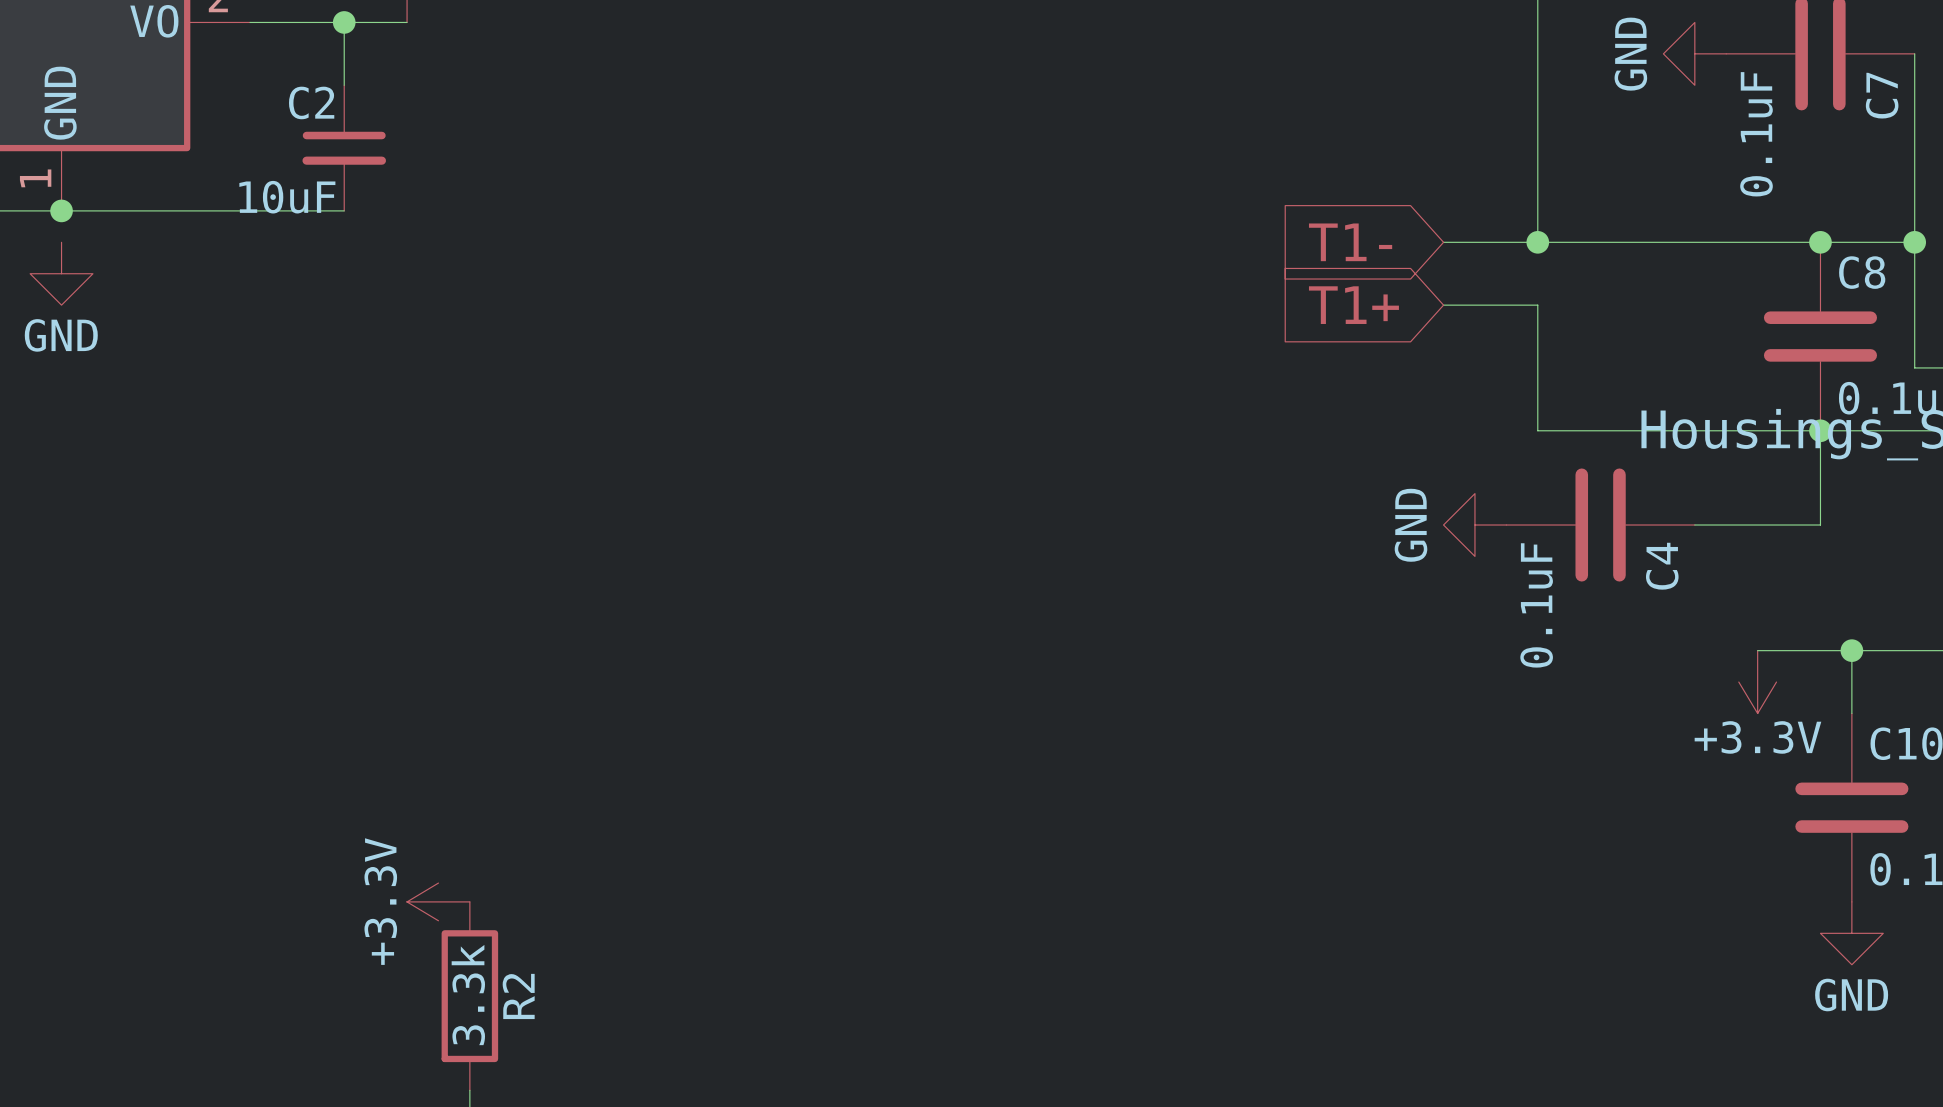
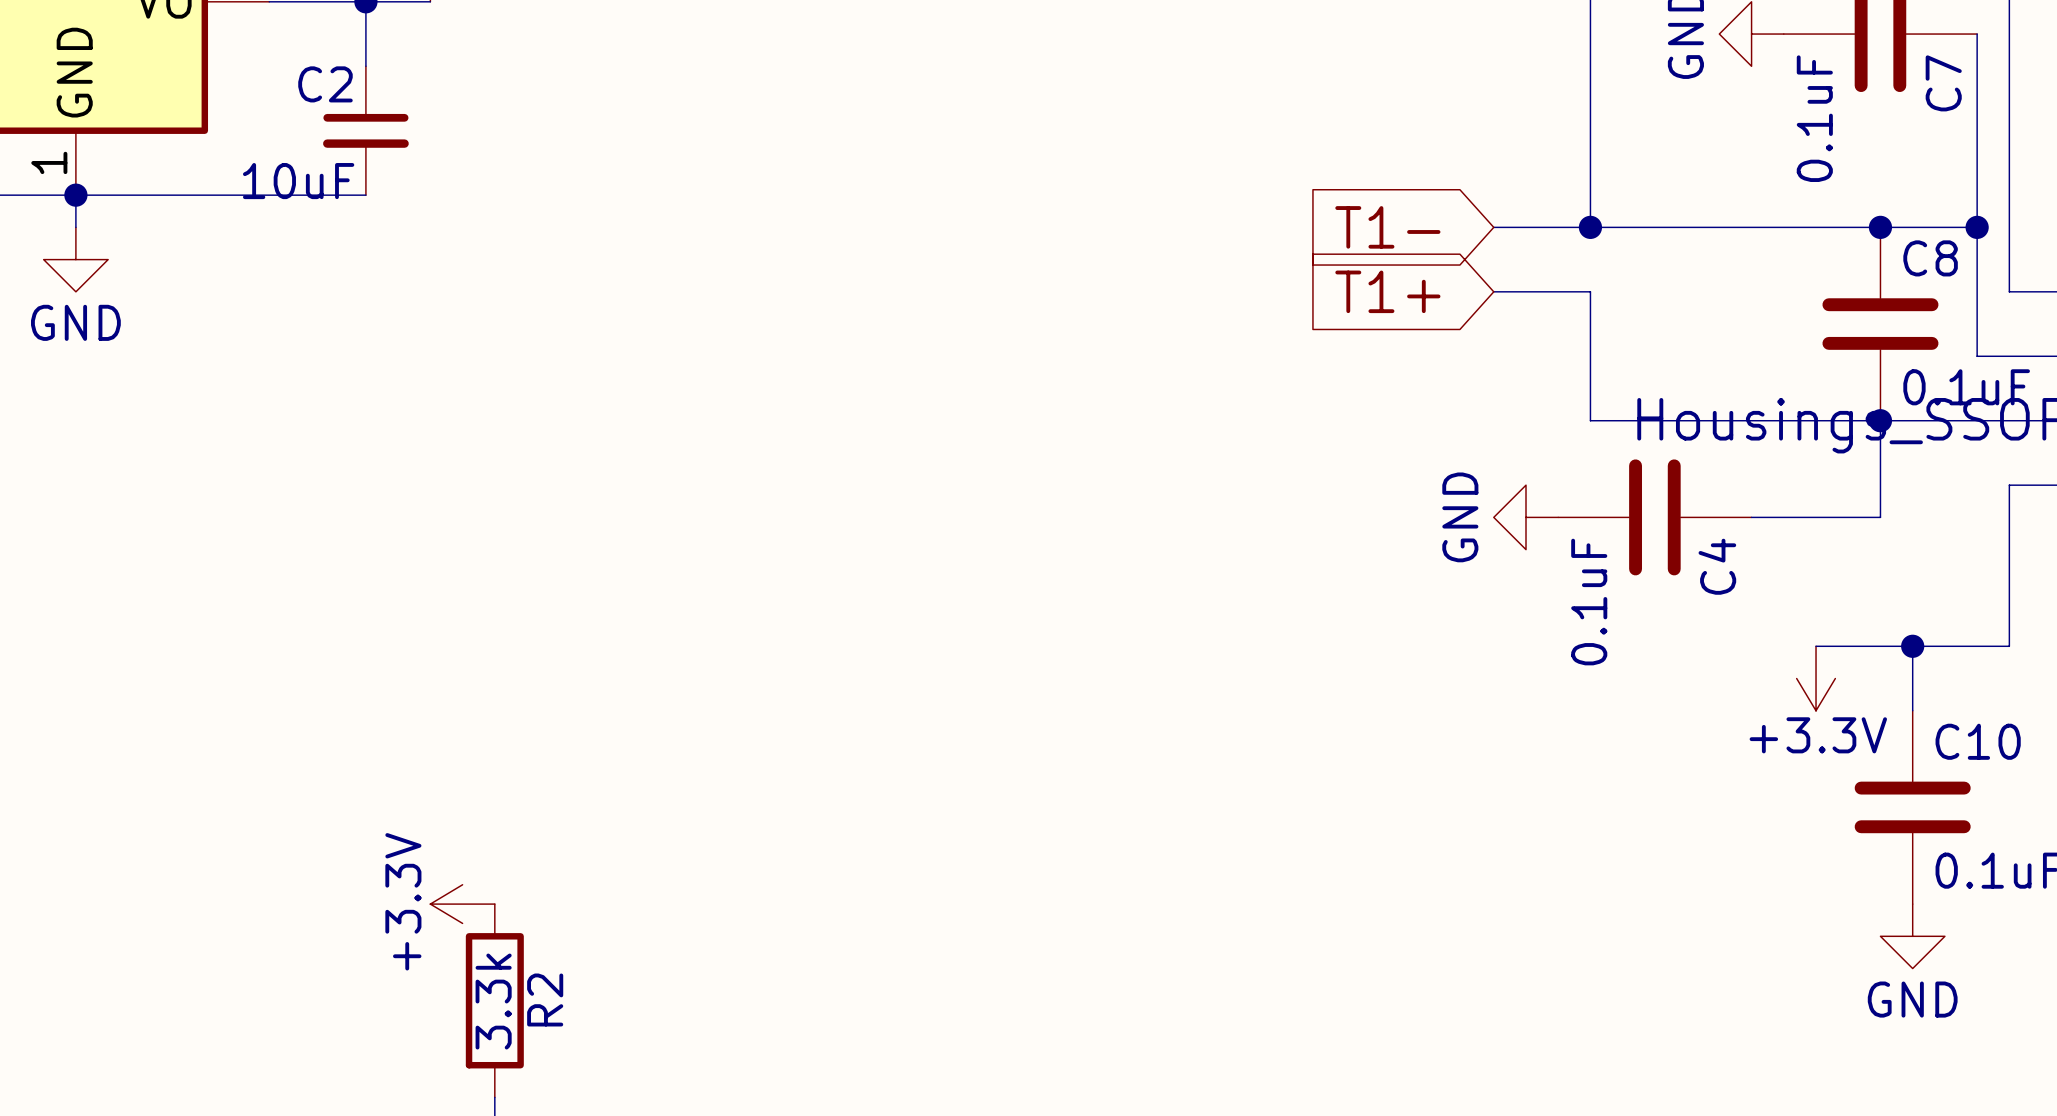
wire: none -> (75, 195) (75, 227)

